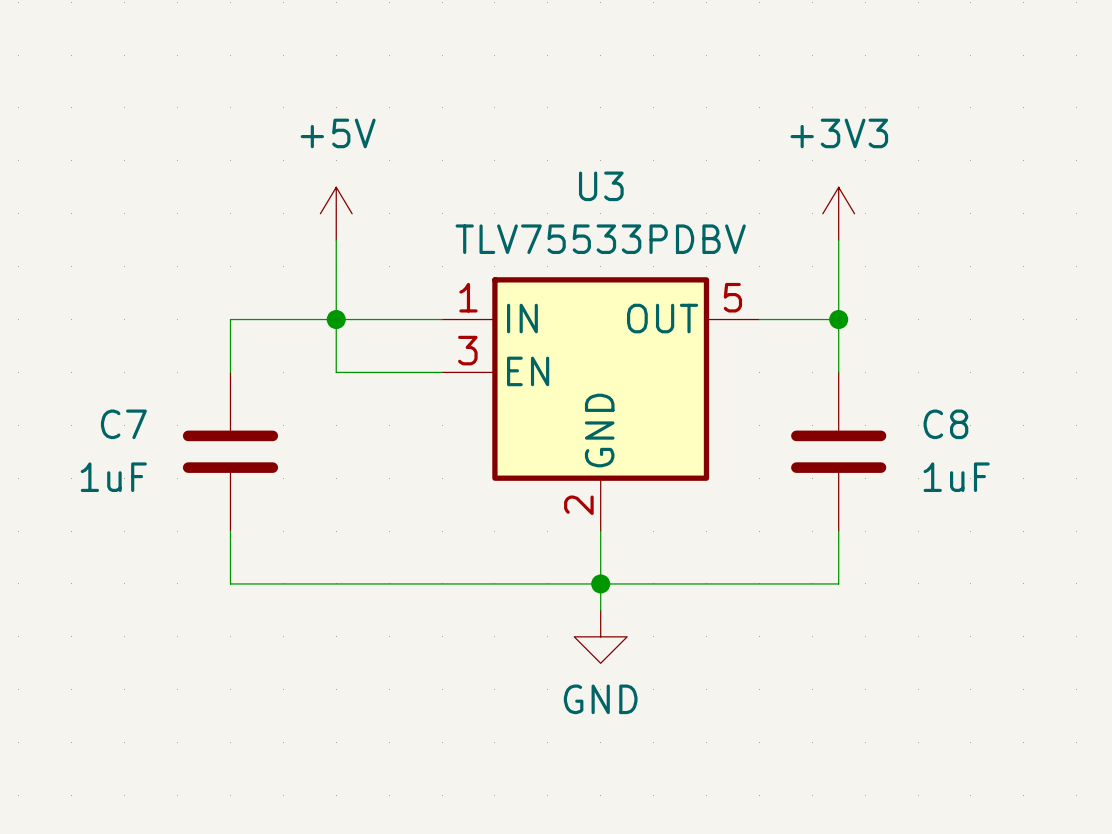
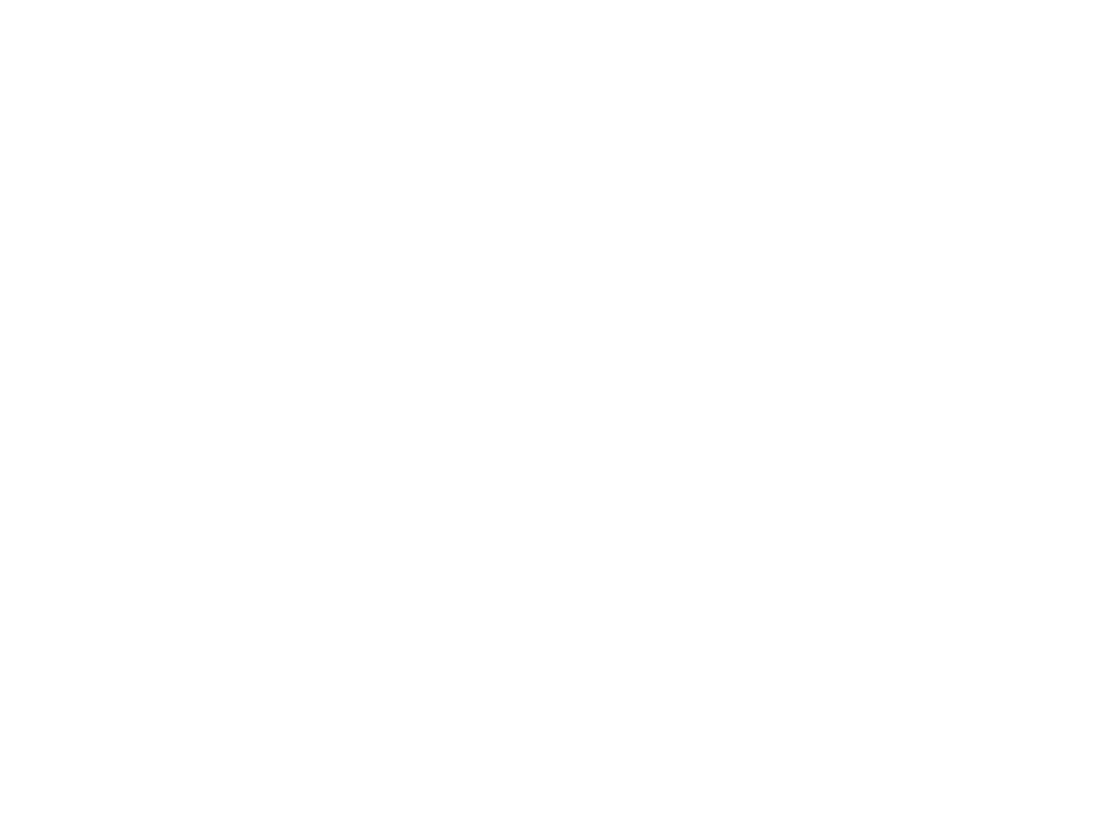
power symbol: +5V (336, 213) -> none
power symbol: +3V3 (838, 213) -> none
wire: (336, 240) (336, 372) (442, 372) -> none
wire: (838, 240) (838, 372) -> none
junction: (336, 319) -> none
wire: (442, 319) (230, 319) (230, 372) -> none
wire: (759, 319) (838, 319) -> none
junction: (838, 319) -> none
U3: TLV75533PDBV (600, 404) -> none
C7: 1uF (230, 451) -> none
C8: 1uF (838, 451) -> none
wire: (230, 531) (230, 583) (838, 583) (838, 531) -> none
wire: (600, 531) (600, 610) -> none
junction: (600, 583) -> none
power symbol: GND (600, 636) -> none

